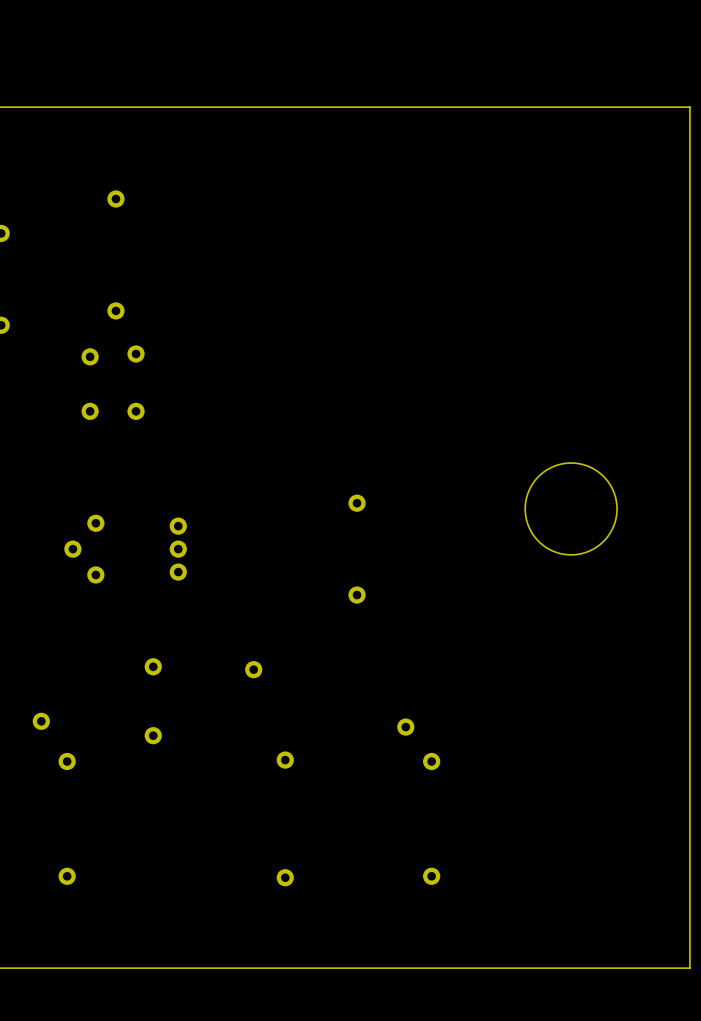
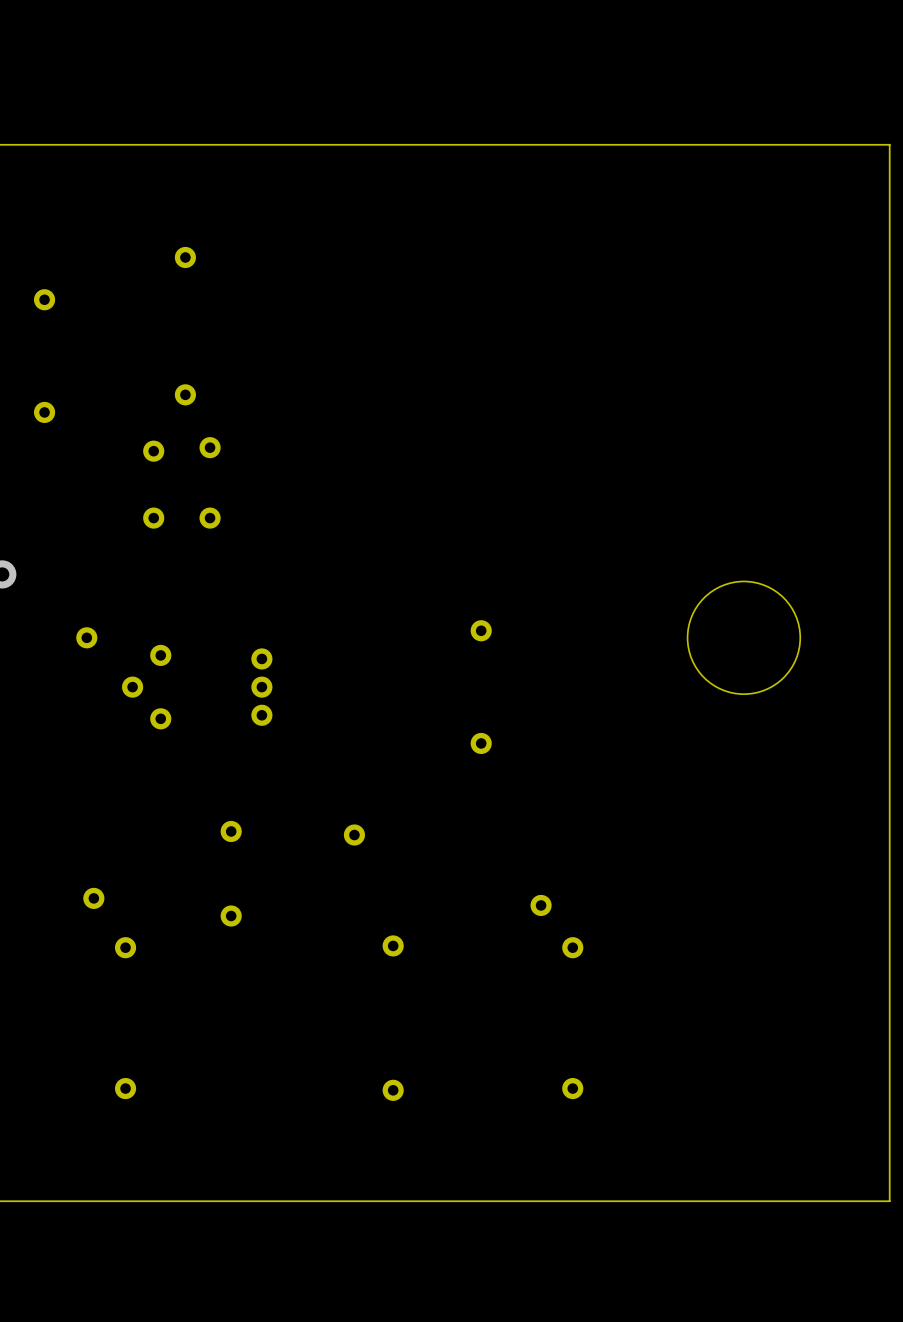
part: none -> (86, 637)

